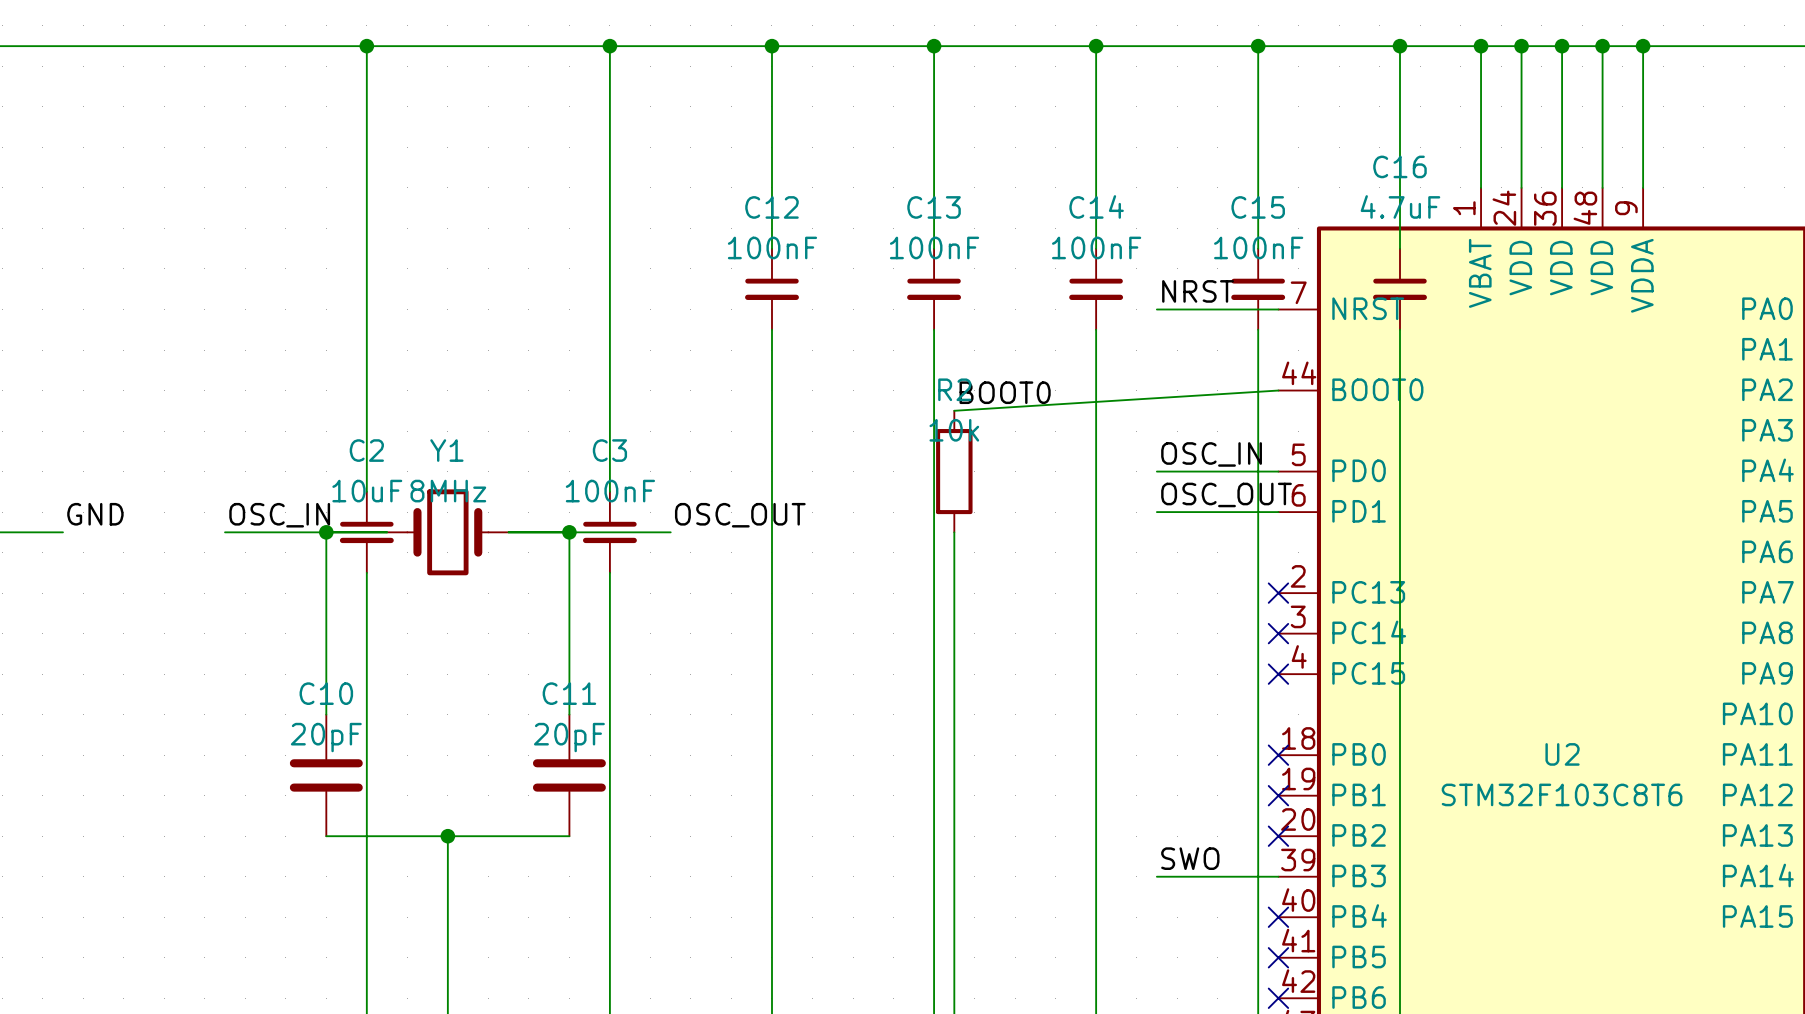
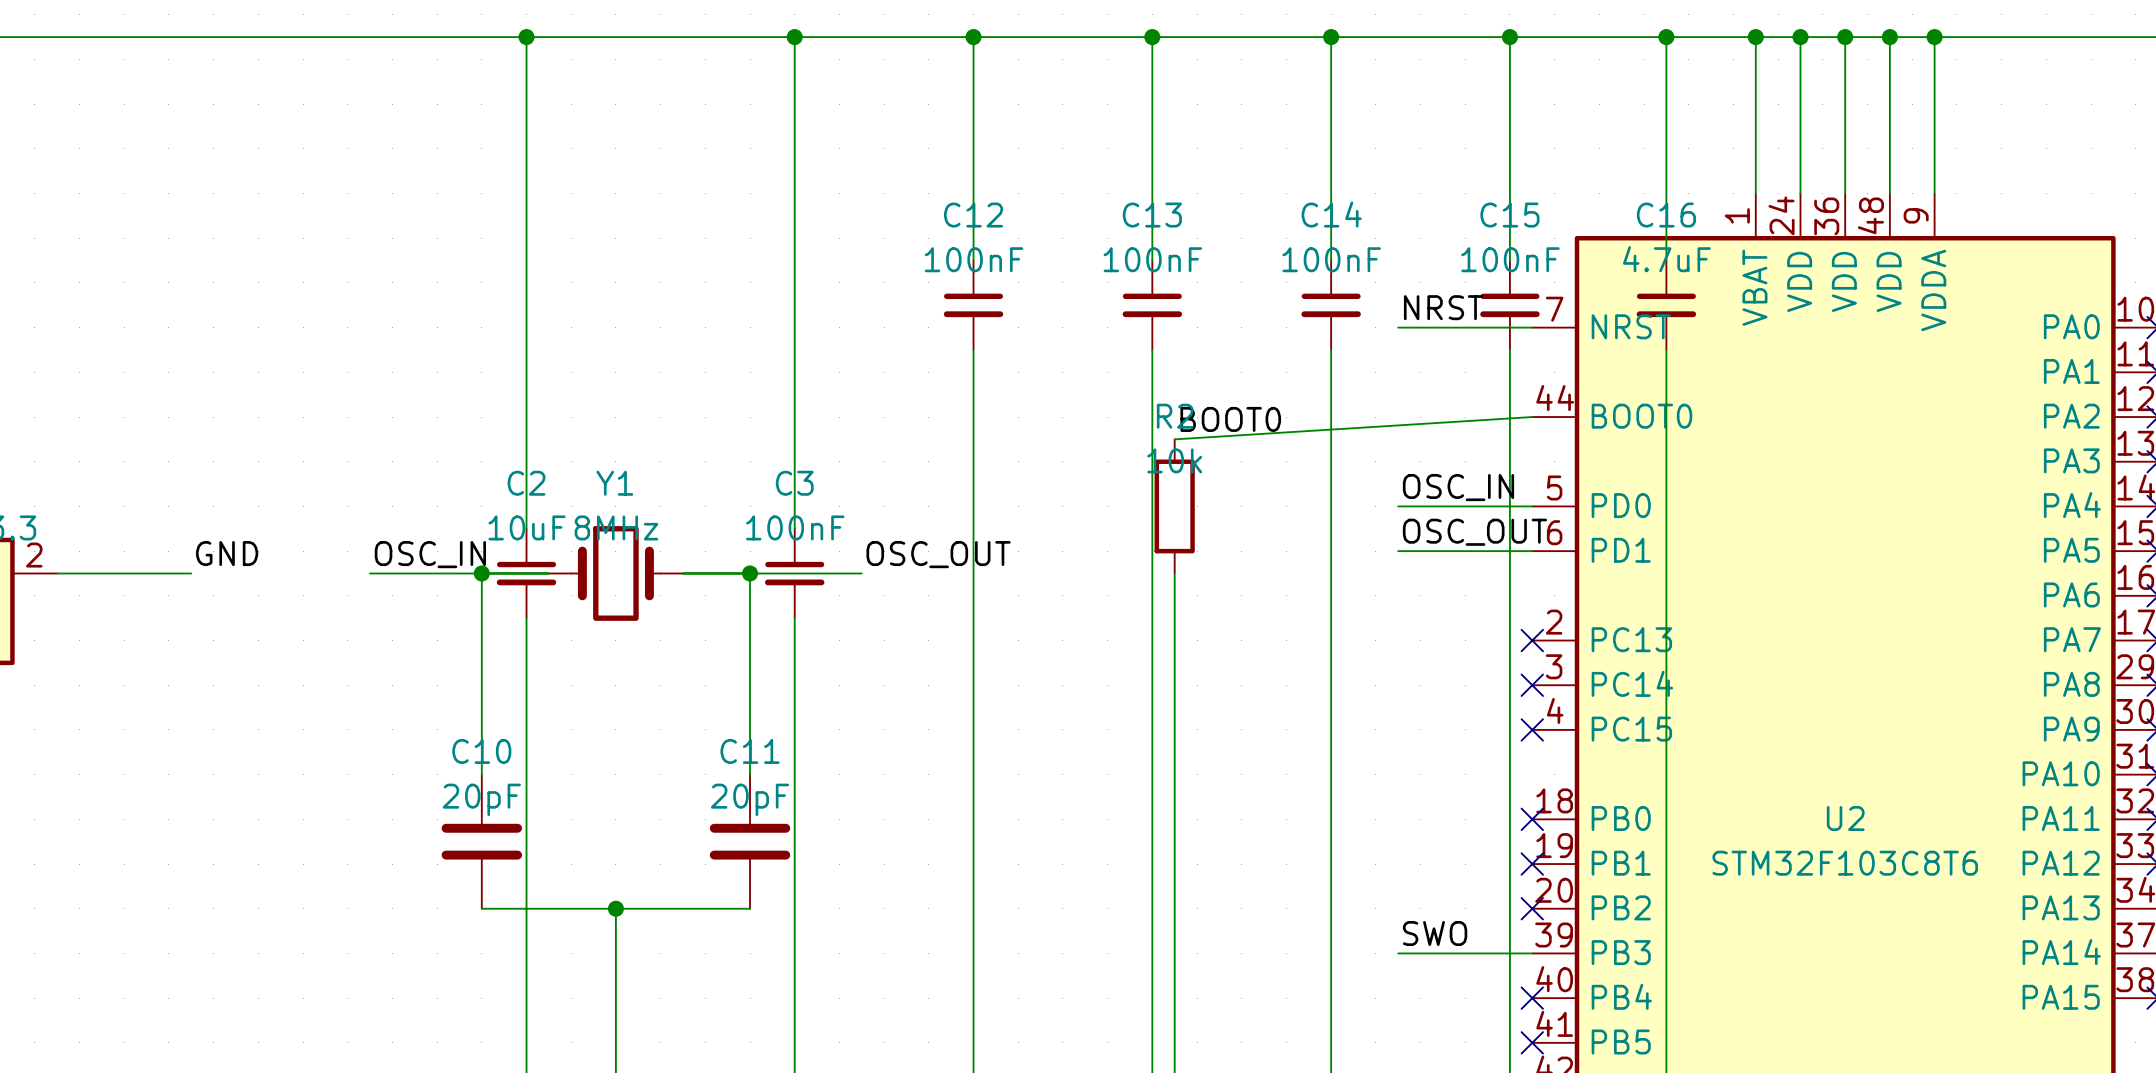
C16 name position: C16 (1399, 166) -> C16 (1666, 215)
C16 value position: 4.7uF (1400, 206) -> 4.7uF (1666, 259)

